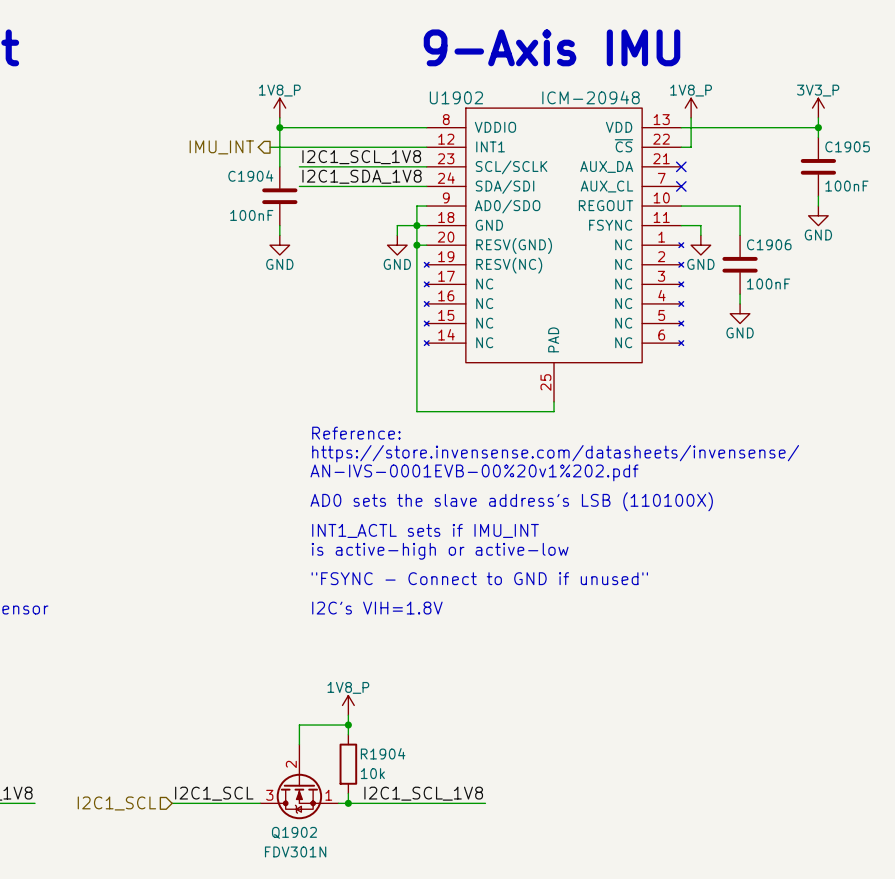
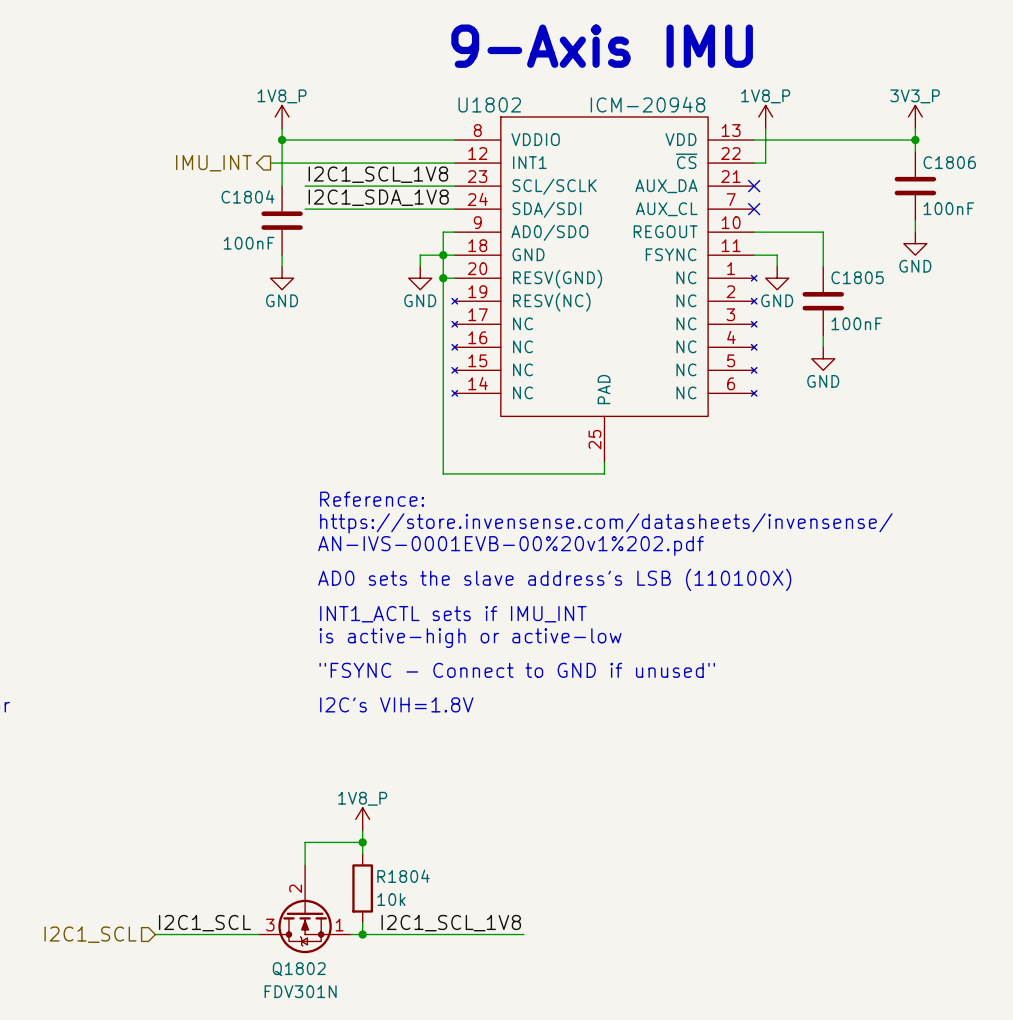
U1902 name: U1902 (456, 97) -> U1802 (489, 104)
C1905 name: C1905 (847, 146) -> C1806 (949, 162)
C1904 name: C1904 (250, 176) -> C1804 (247, 196)
C1906 name: C1906 (769, 244) -> C1805 (857, 277)
R1904 name: R1904 (383, 753) -> R1804 (403, 876)
Q1902 name: Q1902 (294, 832) -> Q1802 (299, 969)

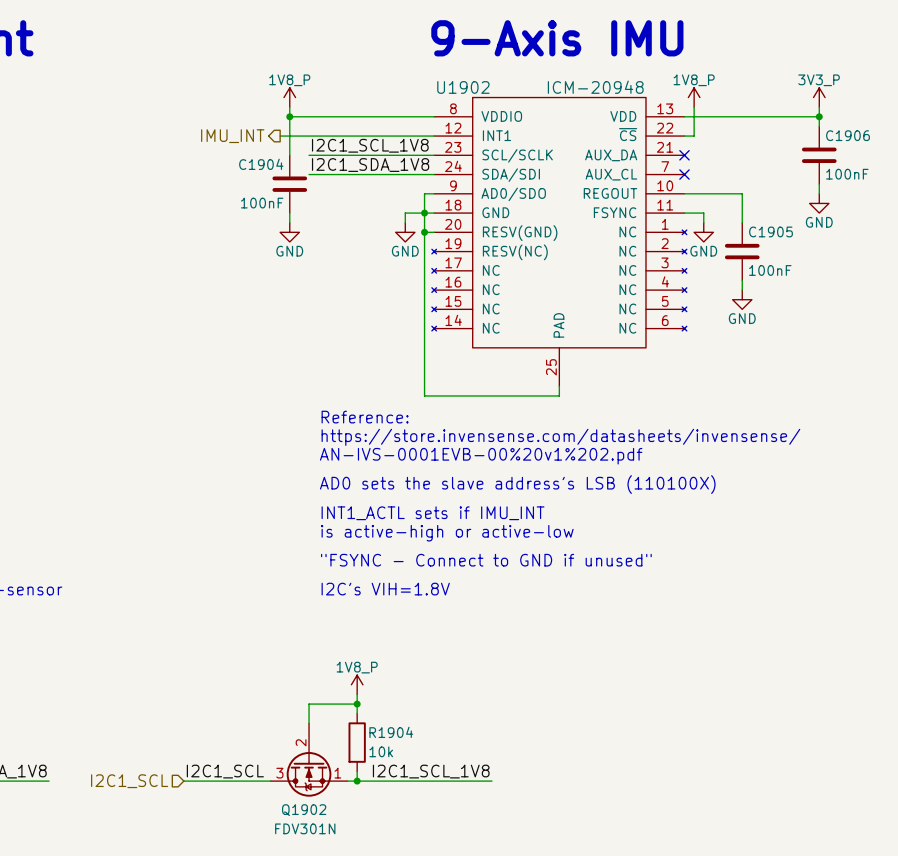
U1802 name: U1802 (489, 104) -> U1902 (463, 87)
C1806 name: C1806 (949, 162) -> C1906 (848, 135)
C1804 name: C1804 (247, 196) -> C1904 (261, 164)
C1805 name: C1805 (857, 277) -> C1905 (770, 231)
R1804 name: R1804 (403, 876) -> R1904 (391, 732)
Q1802 name: Q1802 (299, 969) -> Q1902 (304, 810)

